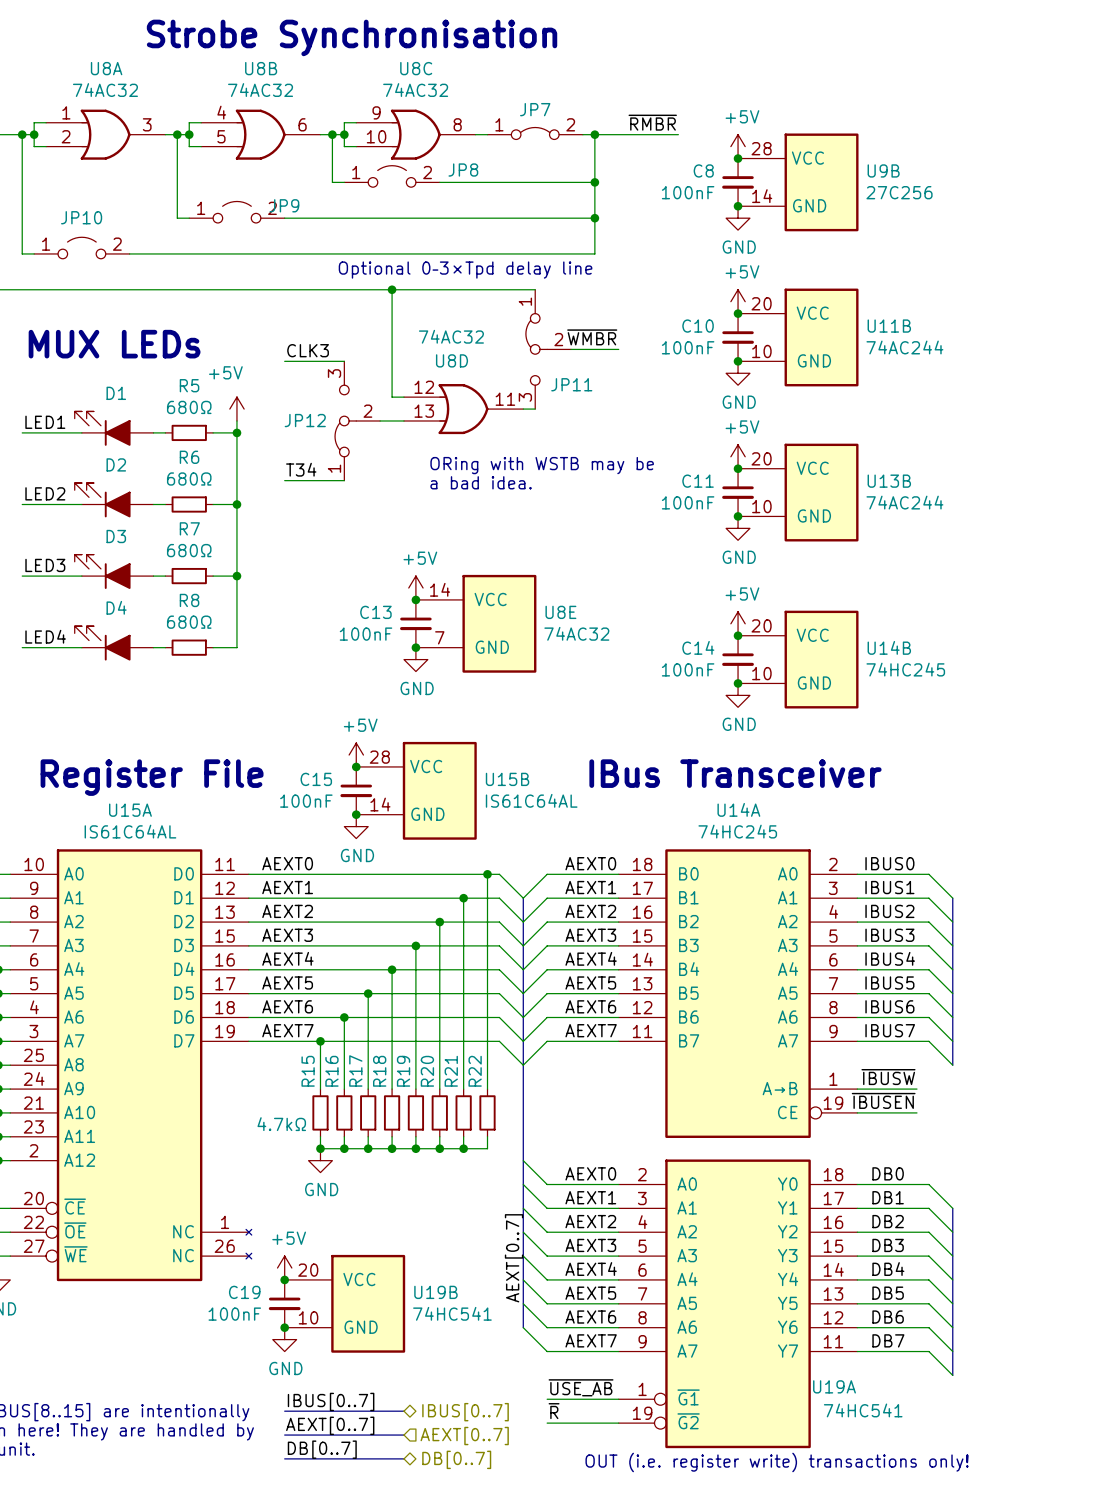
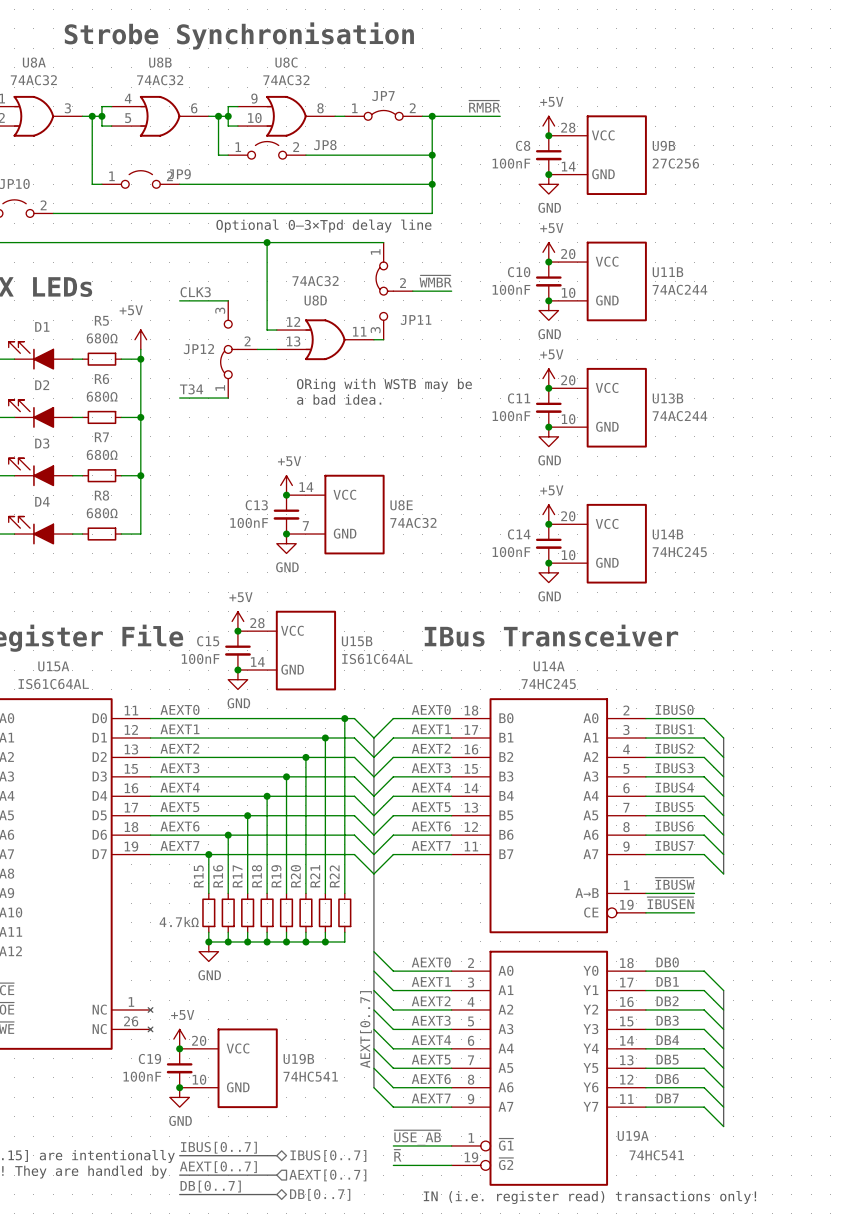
U19A name position: U19A (834, 1386) -> U19A (633, 1135)
text: OUT (i.e. register write) transactions only! (777, 1462) -> IN (i.e. register read) transactions only! (589, 1197)

